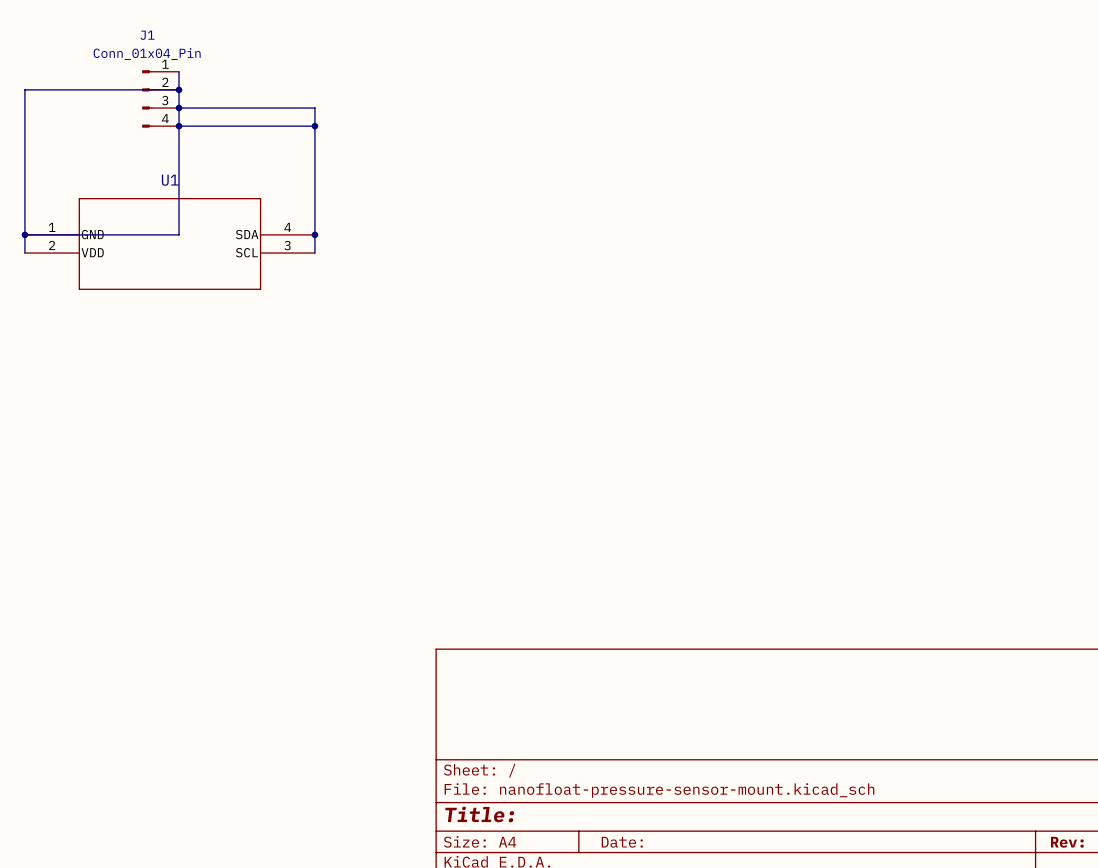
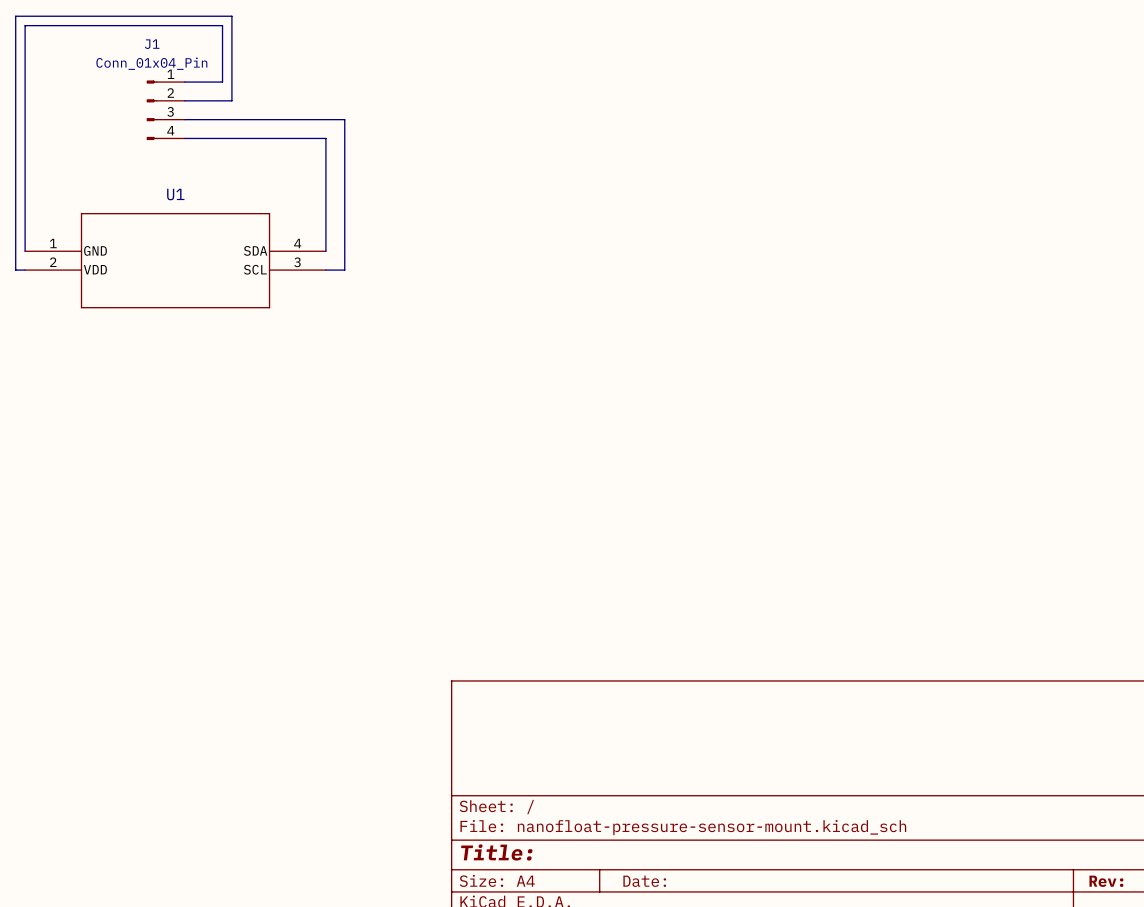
wire: (179, 71) (179, 234) (24, 234) (24, 253) -> (184, 100) (231, 100) (231, 16) (15, 16) (15, 270) (25, 270)
wire: (24, 89) (179, 89) -> (25, 100) (25, 25) (222, 25) (222, 82) (184, 82)
junction: (179, 89) -> none
junction: (179, 108) -> none
wire: (314, 108) (314, 126) -> (325, 119) (344, 119) (344, 270) (325, 270)
junction: (179, 126) -> none
junction: (314, 126) -> none
junction: (24, 234) -> none
wire: (314, 234) (314, 253) -> none
junction: (314, 234) -> none

